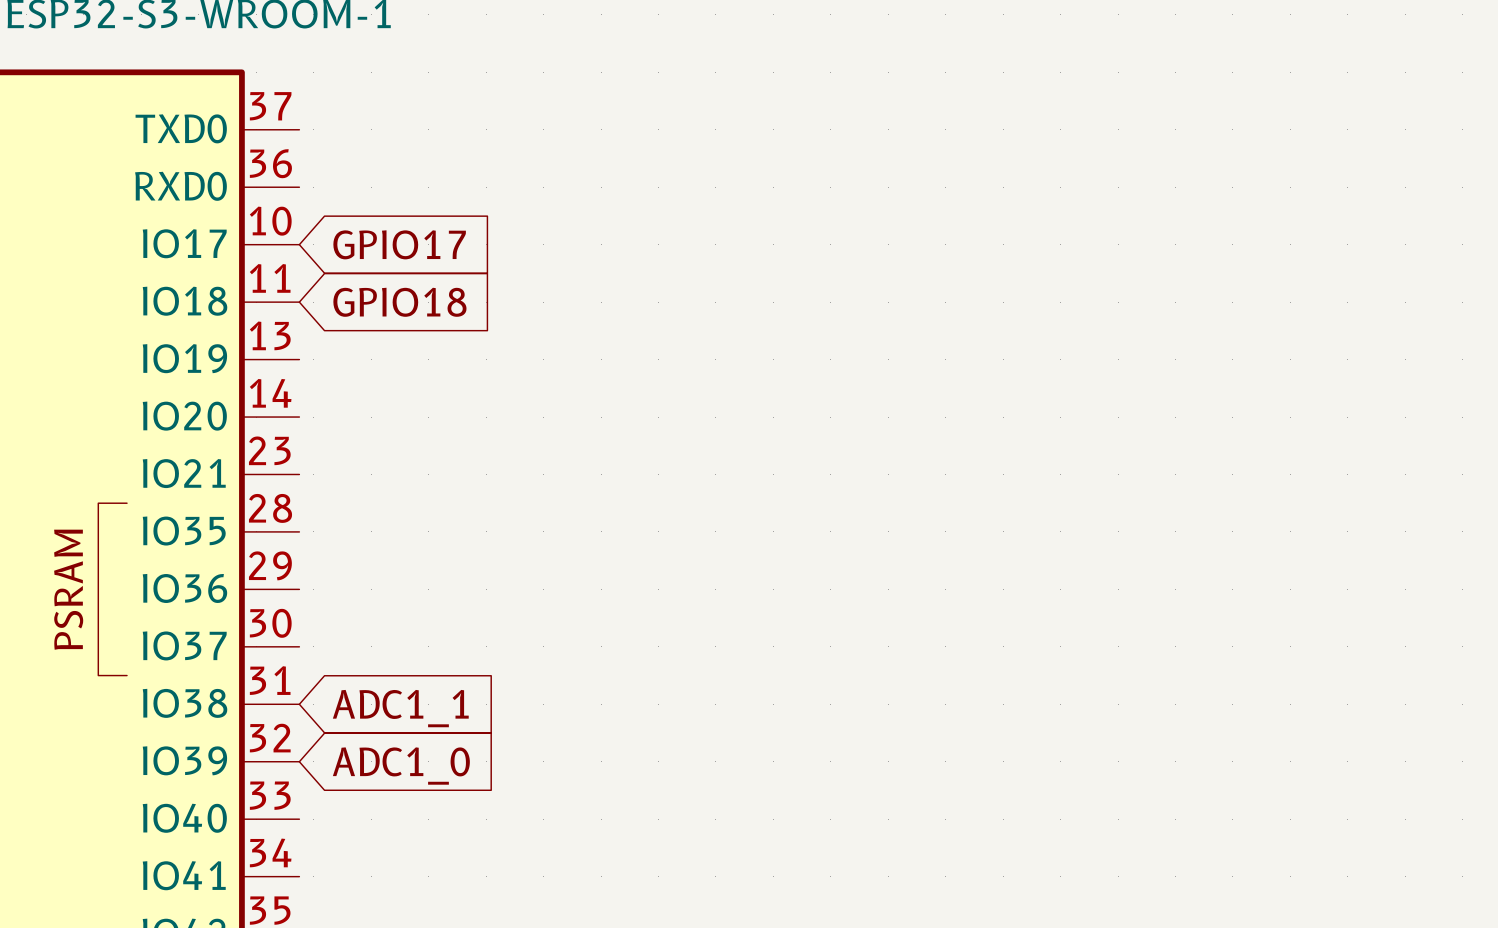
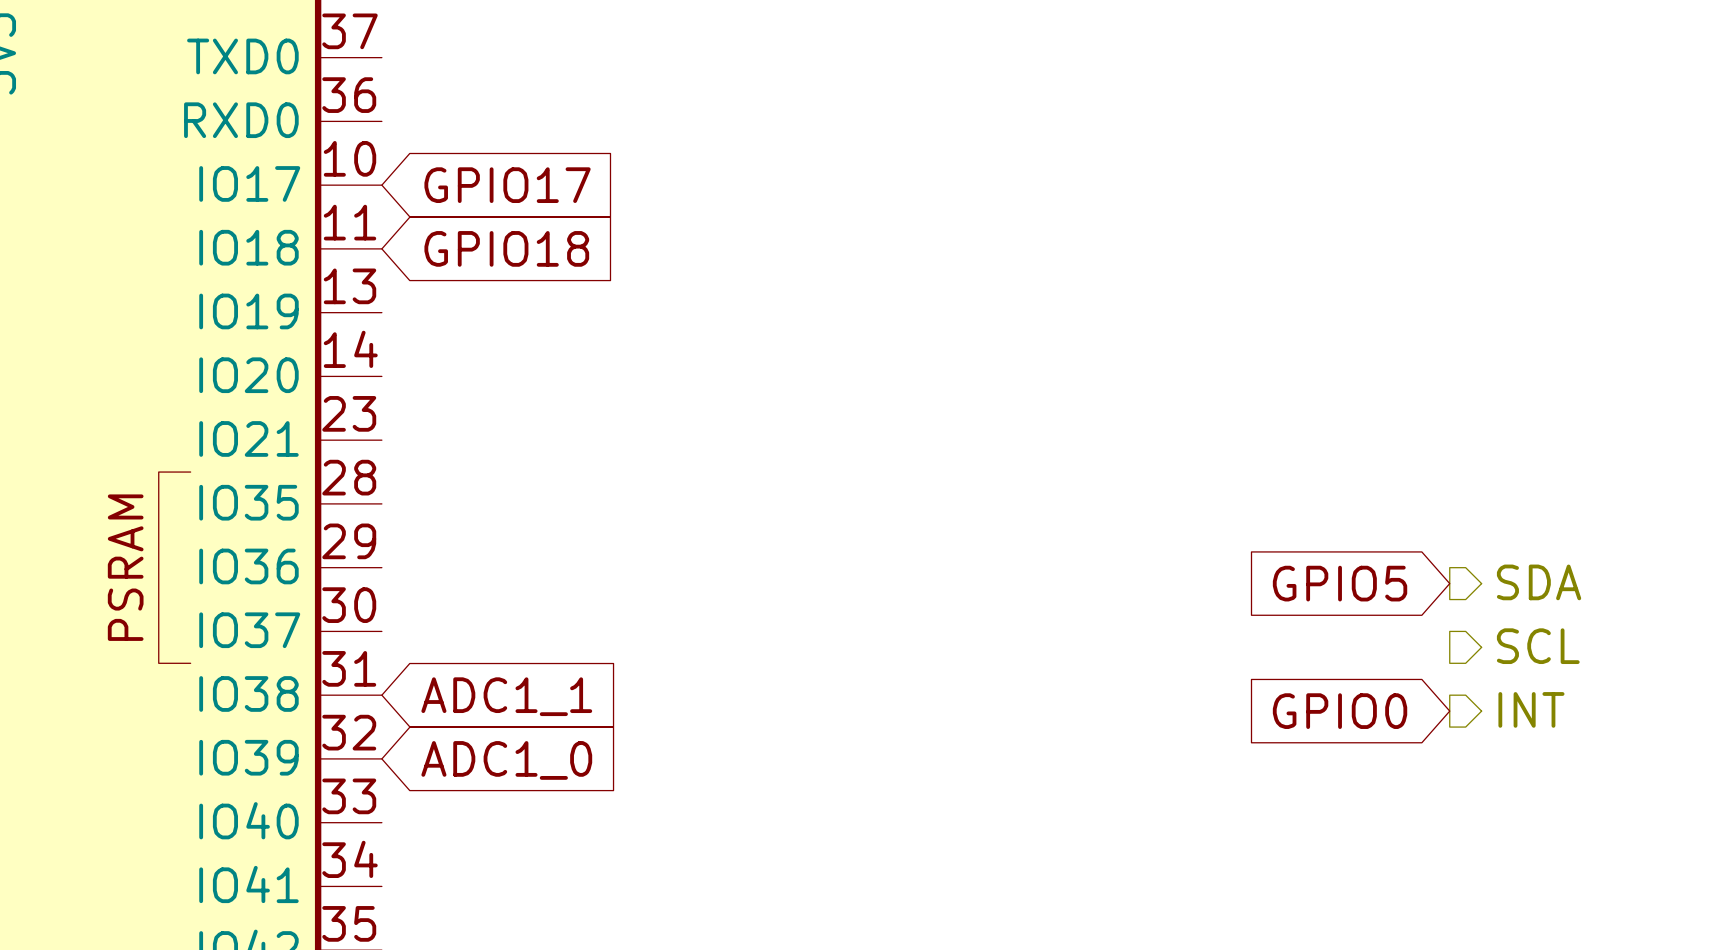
hierarchical label: none -> SDA (1539, 582)
global label: none -> GPIO5 (1340, 583)
hierarchical label: none -> SCL (1538, 646)
hierarchical label: none -> INT (1531, 709)
global label: none -> GPIO0 (1340, 711)

